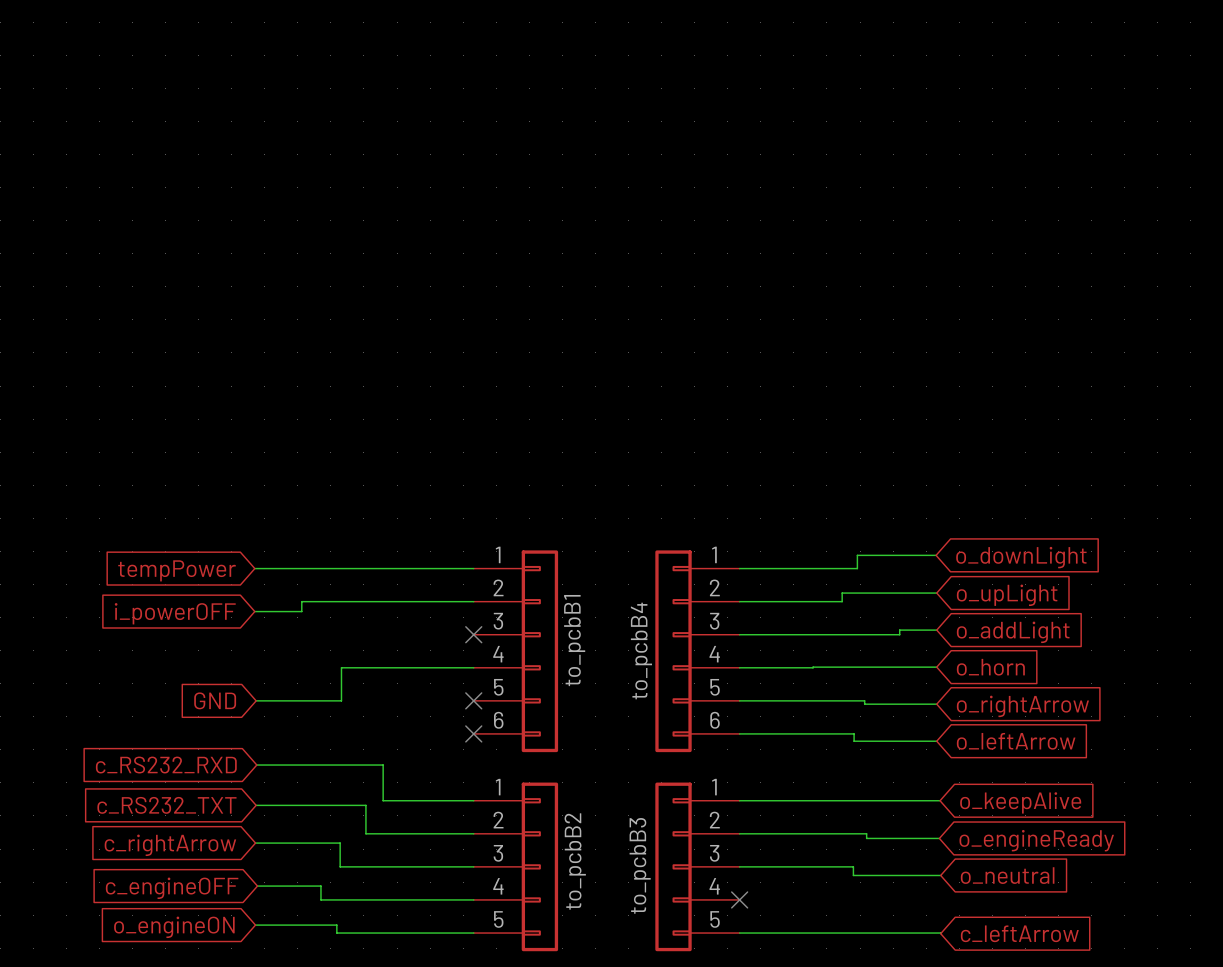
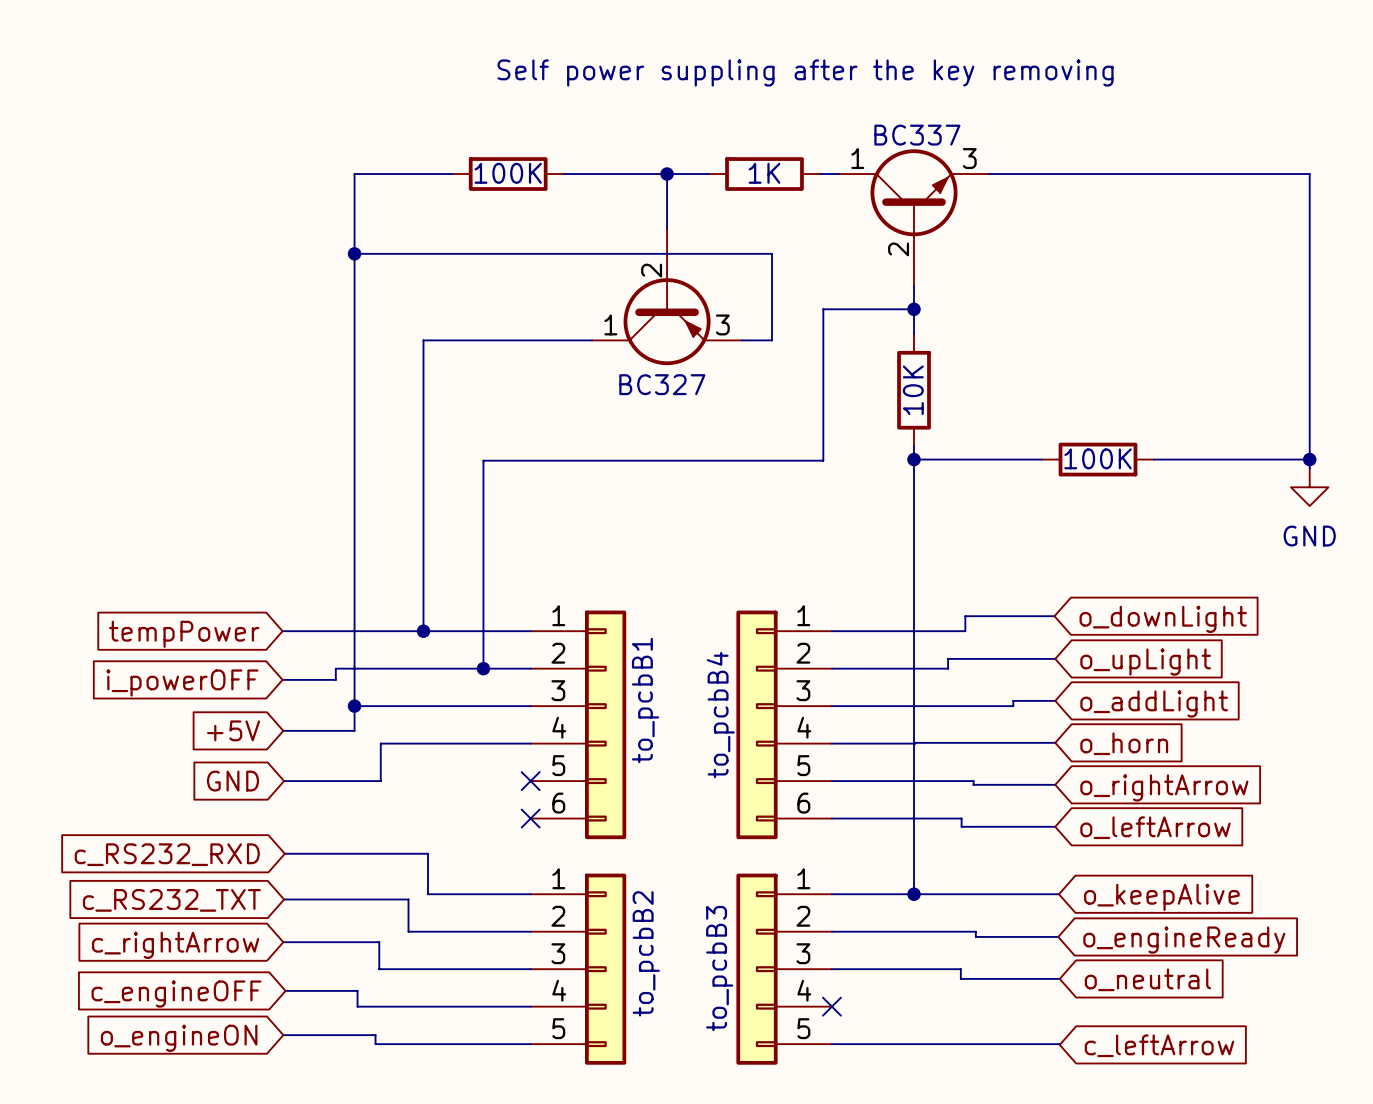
text: none -> Self power suppling after the key removing (805, 72)
wire: none -> (451, 174) (354, 174) (354, 730) (283, 730)
part: none -> 100K (508, 174)
wire: none -> (564, 174) (708, 174)
wire: none -> (667, 174) (667, 227)
junction: none -> (667, 174)
part: none -> 1K (764, 174)
wire: none -> (820, 174) (839, 174)
wire: none -> (988, 174) (1309, 174) (1309, 468)
part: none -> BC337 (914, 217)
wire: none -> (354, 253) (771, 253) (771, 340) (742, 340)
junction: none -> (354, 253)
wire: none -> (914, 286) (914, 334)
part: none -> BC327 (667, 296)
wire: none -> (914, 309) (823, 309) (823, 460) (483, 460) (483, 668)
junction: none -> (914, 309)
wire: none -> (592, 340) (423, 340) (423, 631)
part: none -> 10K (914, 390)
wire: none -> (914, 446) (914, 894)
wire: none -> (914, 459) (1041, 459)
junction: none -> (914, 459)
part: none -> 100K (1097, 459)
wire: none -> (1154, 459) (1309, 459)
junction: none -> (1309, 459)
power symbol: none -> GND (1309, 487)
junction: none -> (423, 631)
junction: none -> (483, 668)
wire: none -> (354, 706) (530, 706)
junction: none -> (354, 706)
no-connect mark: (473, 634) -> none
global label: none -> +5V (233, 730)
junction: none -> (914, 894)

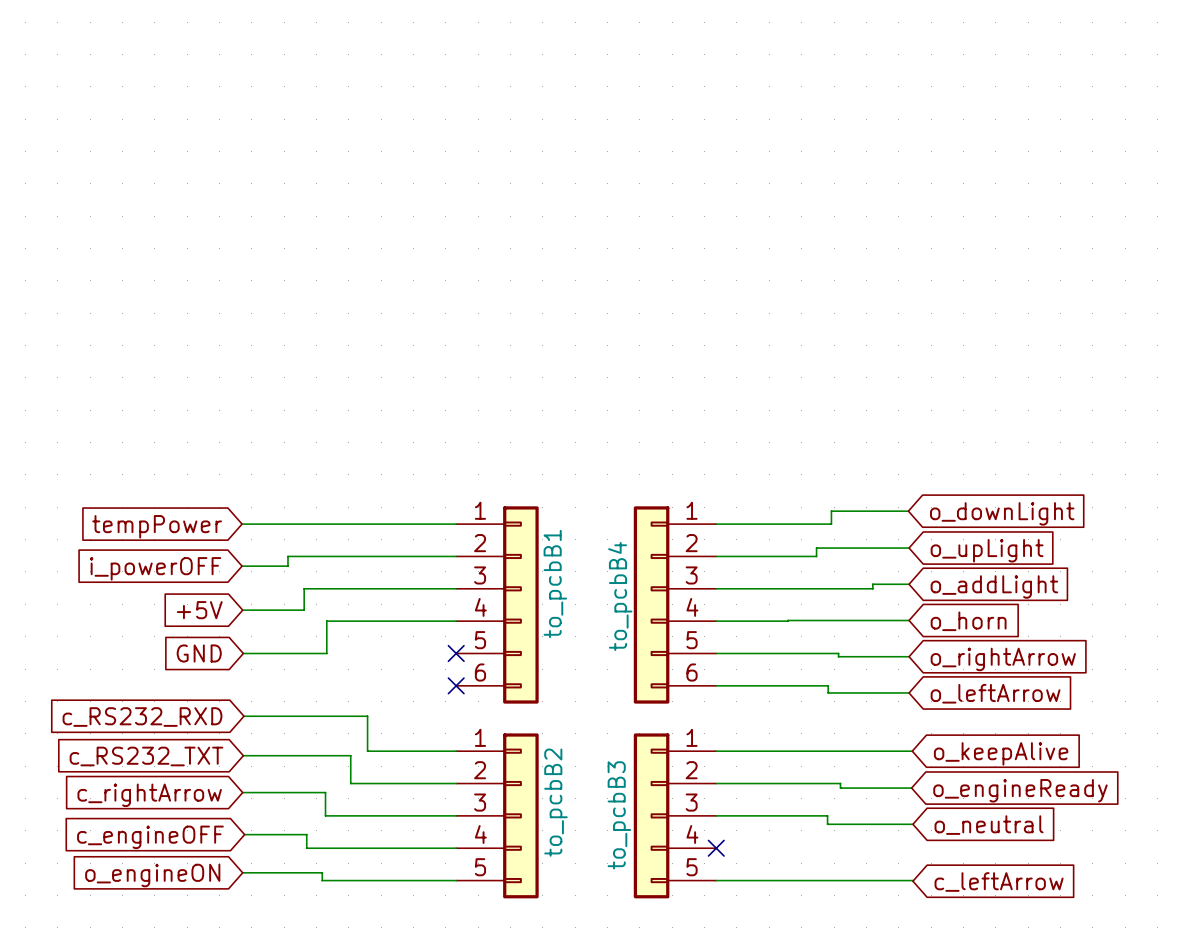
text: Self power suppling after the key removing (805, 72) -> none
wire: (451, 174) (354, 174) (354, 706) -> none
part: 100K (508, 174) -> none
wire: (564, 174) (708, 174) -> none
wire: (667, 174) (667, 227) -> none
junction: (667, 174) -> none
part: 1K (764, 174) -> none
wire: (820, 174) (839, 174) -> none
wire: (988, 174) (1309, 174) (1309, 468) -> none
part: BC337 (914, 217) -> none
wire: (354, 253) (771, 253) (771, 340) (742, 340) -> none
junction: (354, 253) -> none
wire: (914, 286) (914, 334) -> none
part: BC327 (667, 296) -> none
wire: (914, 309) (823, 309) (823, 460) (483, 460) (483, 668) -> none
junction: (914, 309) -> none
wire: (592, 340) (423, 340) (423, 631) -> none
part: 10K (914, 390) -> none
wire: (914, 446) (914, 894) -> none
wire: (914, 459) (1041, 459) -> none
junction: (914, 459) -> none
part: 100K (1097, 459) -> none
wire: (1154, 459) (1309, 459) -> none
junction: (1309, 459) -> none
power symbol: GND (1309, 487) -> none
junction: (423, 631) -> none
junction: (483, 668) -> none
junction: (354, 706) -> none
junction: (914, 894) -> none

